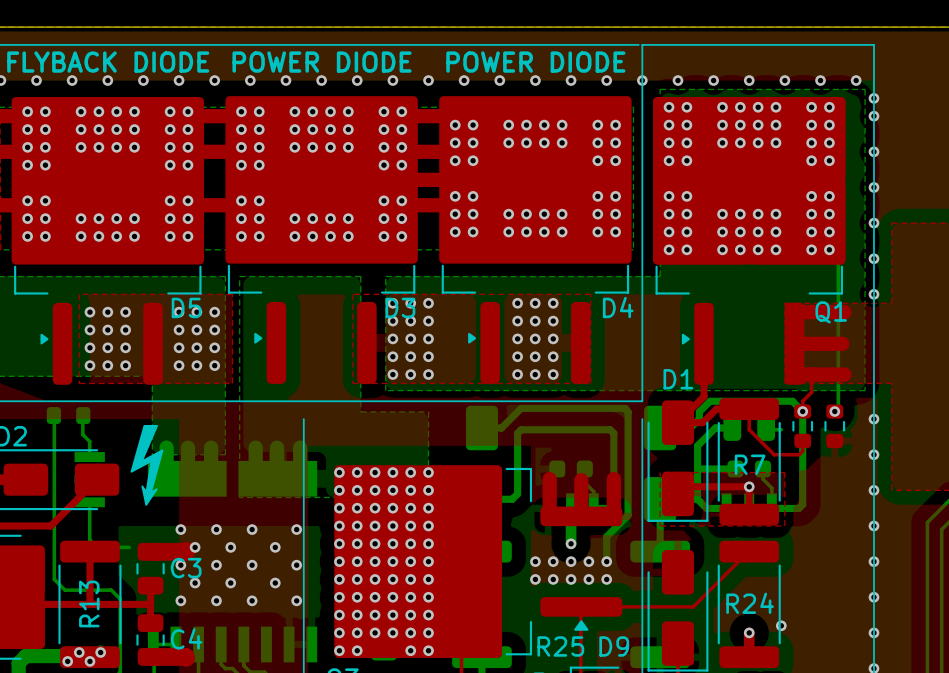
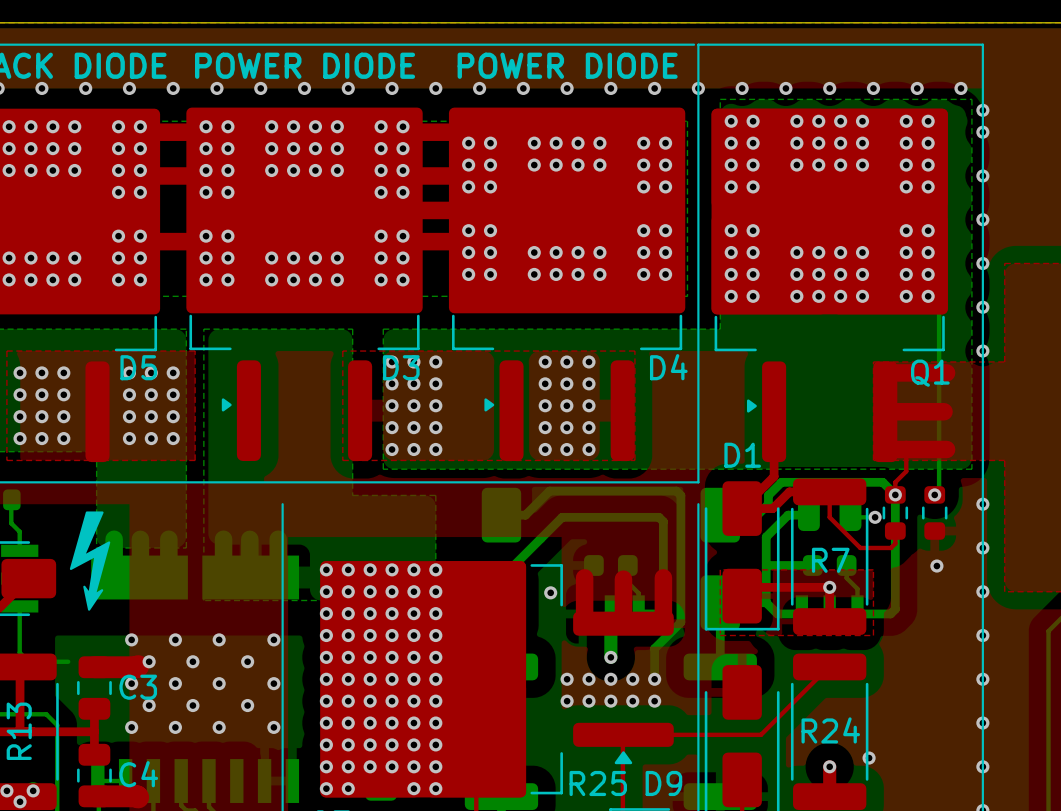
bottom track: (531, 429) (521, 429) (517, 433) (517, 493) (512, 499) (481, 499) -> (562, 517) (501, 578) (501, 602)
via: none -> (875, 517)
via: none -> (936, 566)
via: none -> (550, 592)

